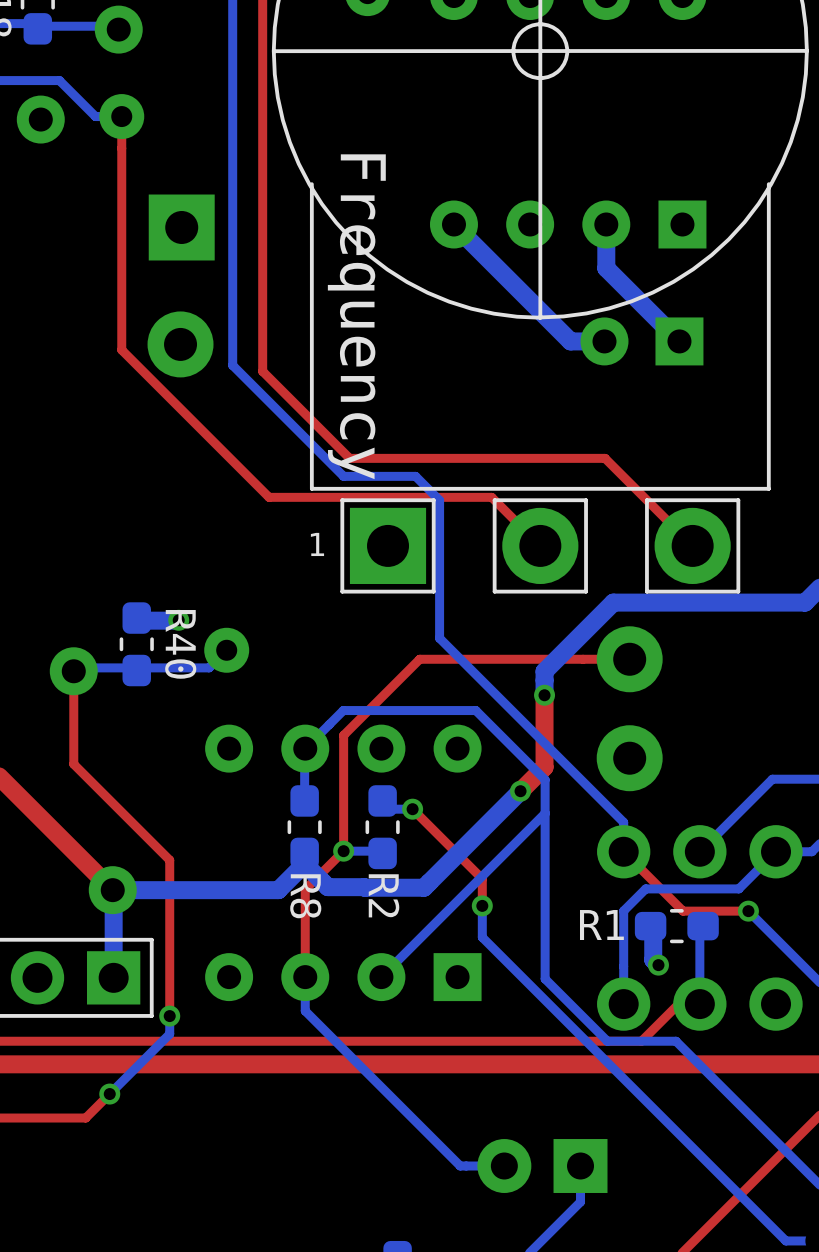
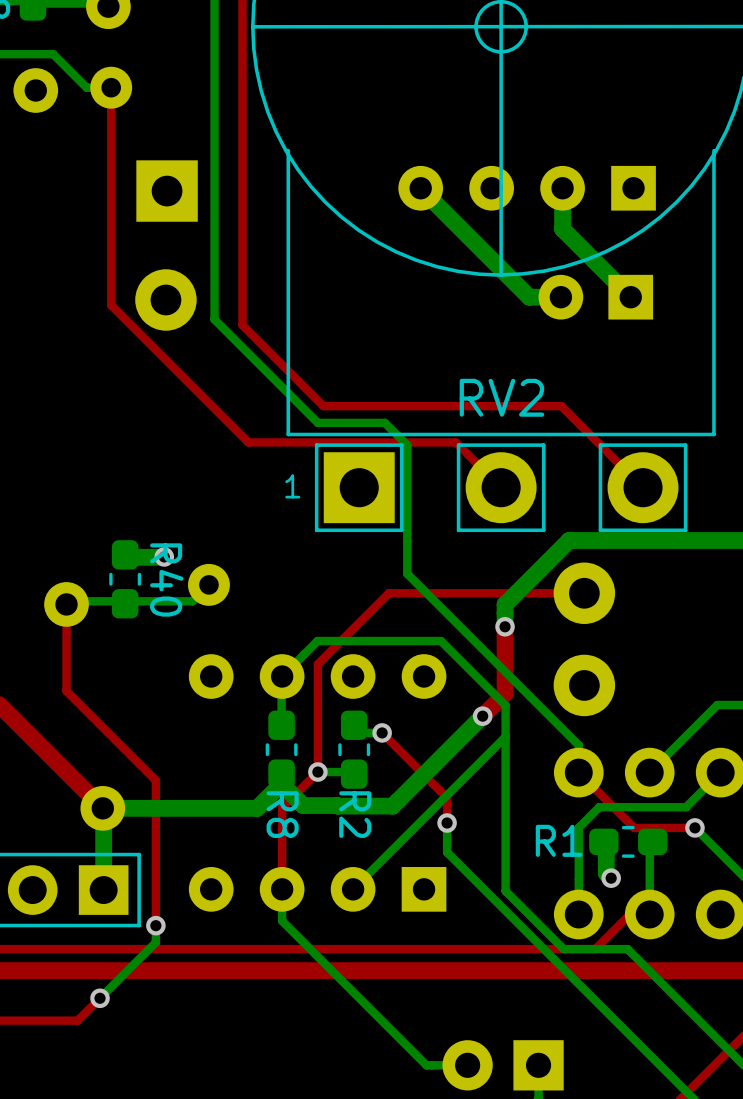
text: Frequency (356, 316) -> none
RV2 name: none -> RV2 (501, 397)

